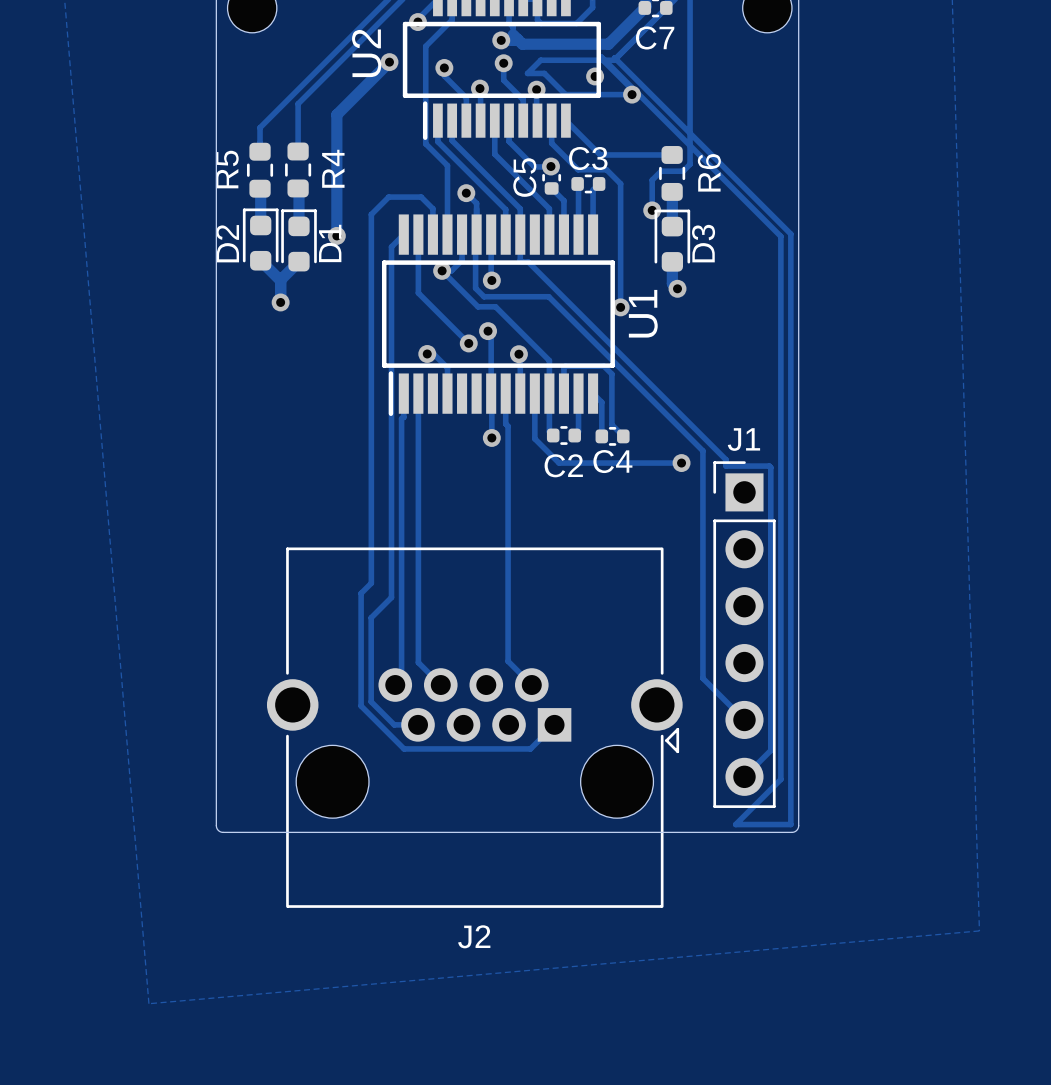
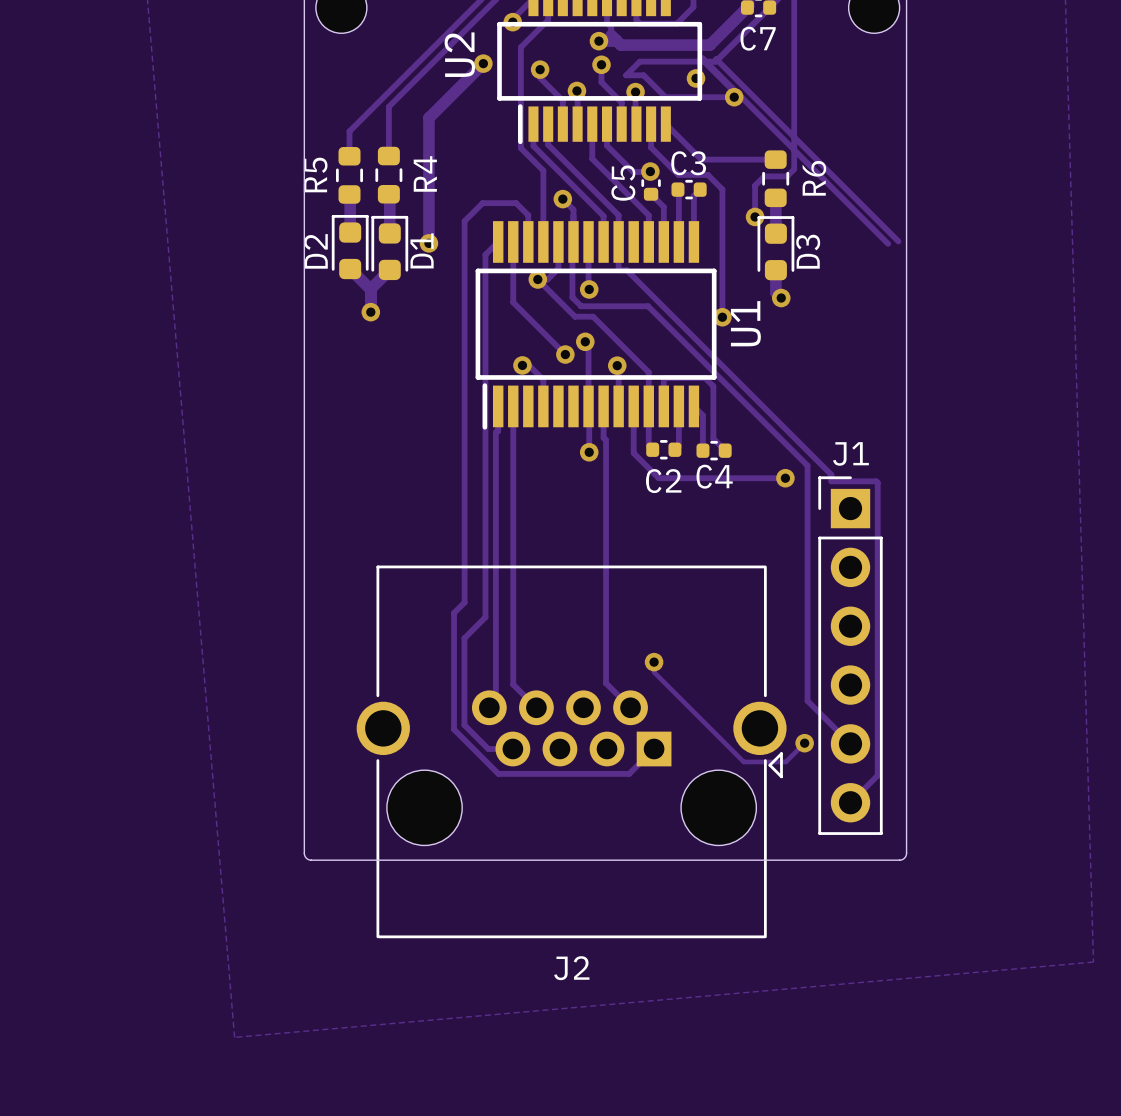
track: (790, 234) (790, 824) (735, 824) (780, 779) (780, 236) -> none
track: none -> (654, 662) (654, 672) (743, 761) (785, 761) (804, 743)
via: none -> (654, 662)
via: none -> (804, 743)

